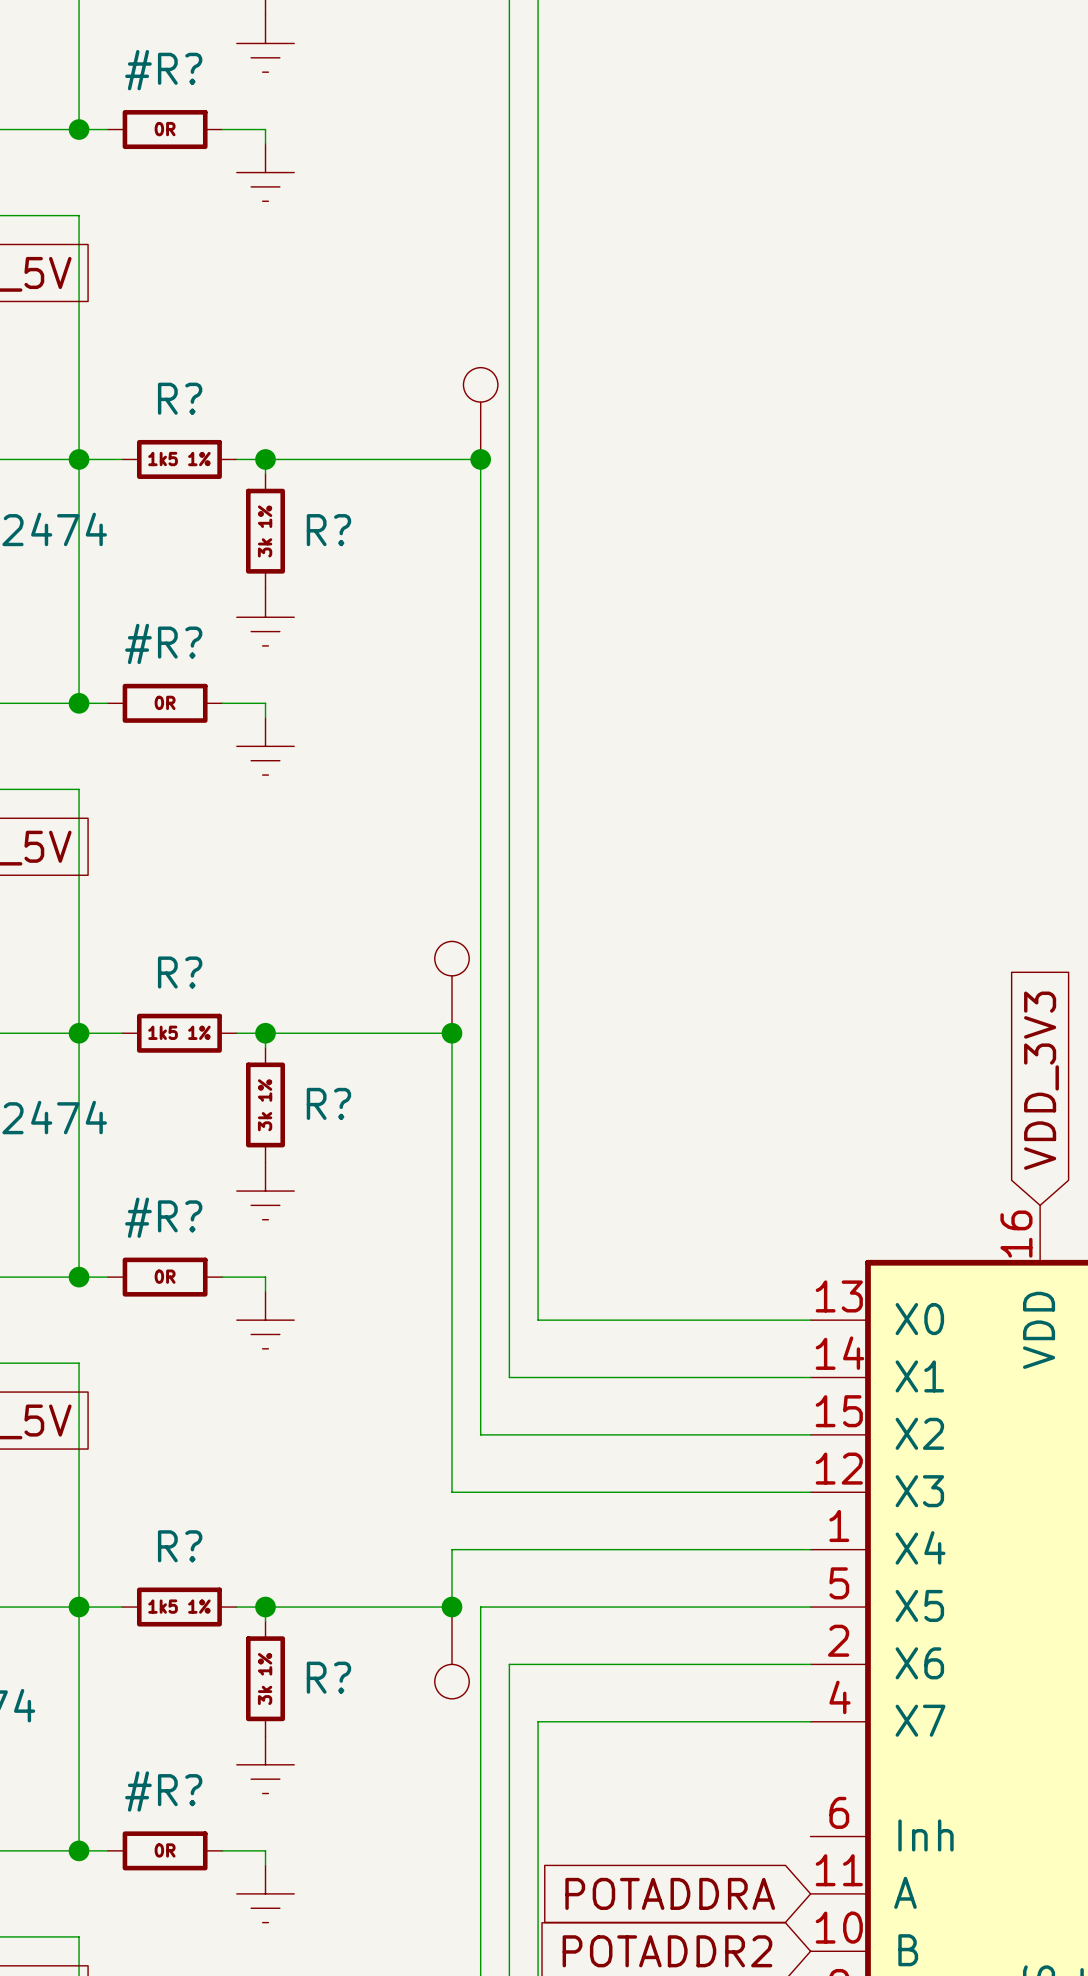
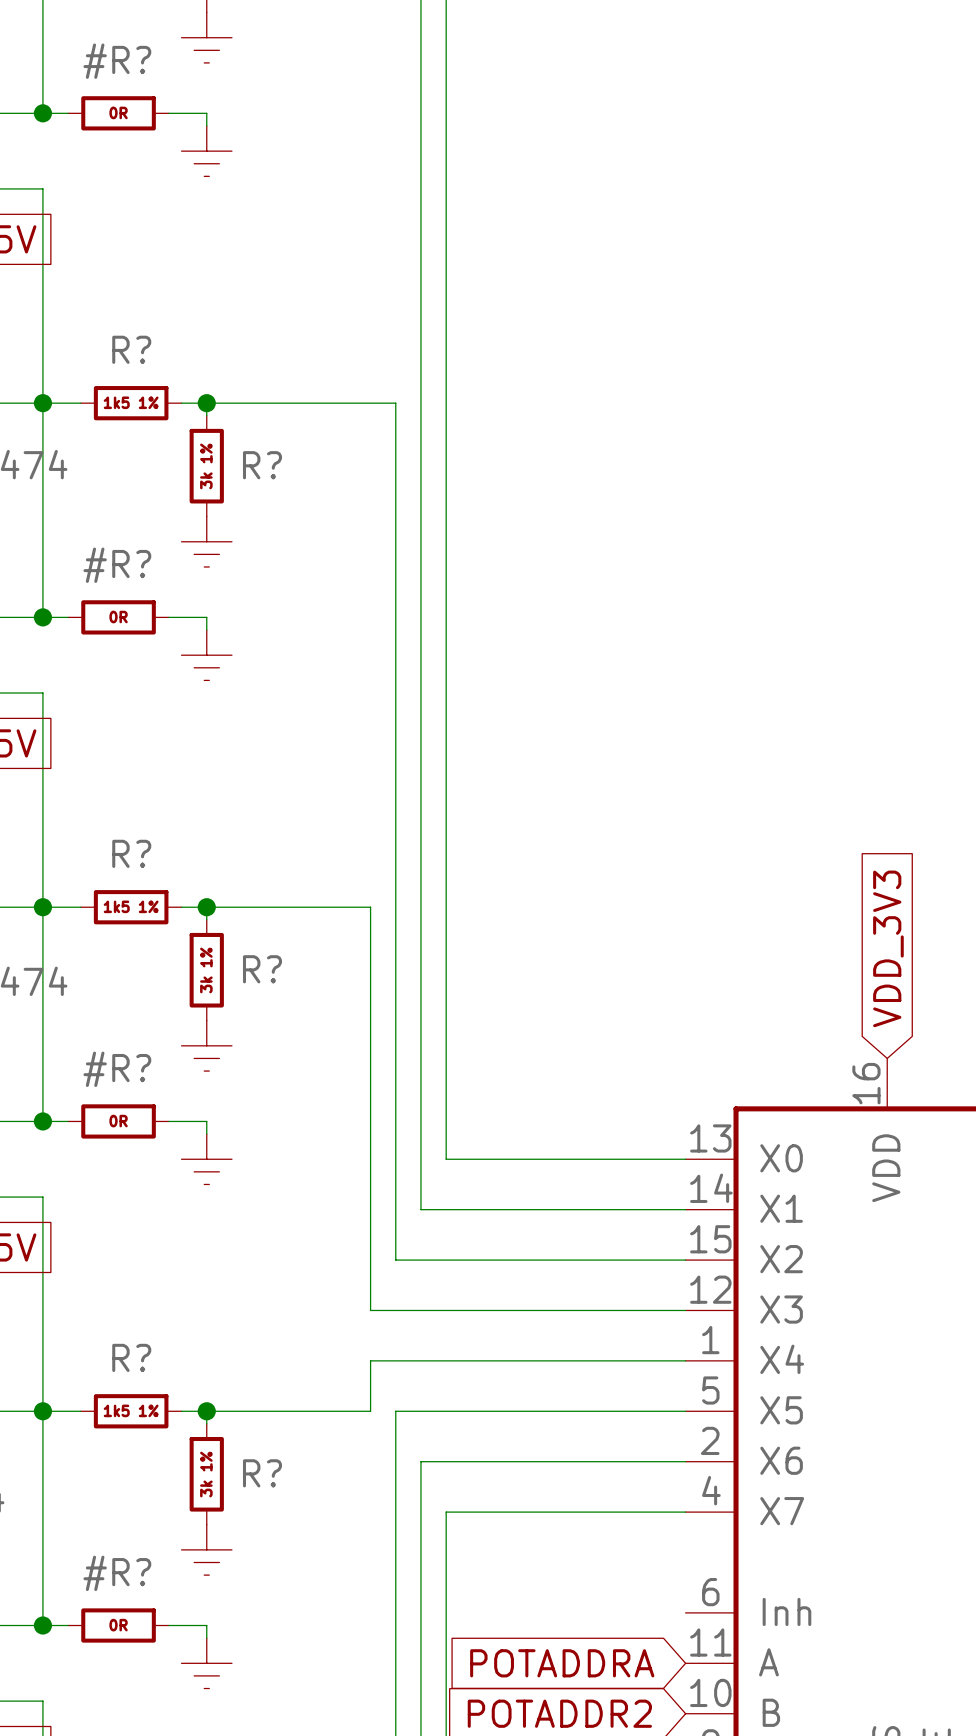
part: (480, 413) -> none
junction: (480, 459) -> none
part: (451, 987) -> none
junction: (451, 1033) -> none
junction: (451, 1607) -> none
part: (451, 1652) -> none

